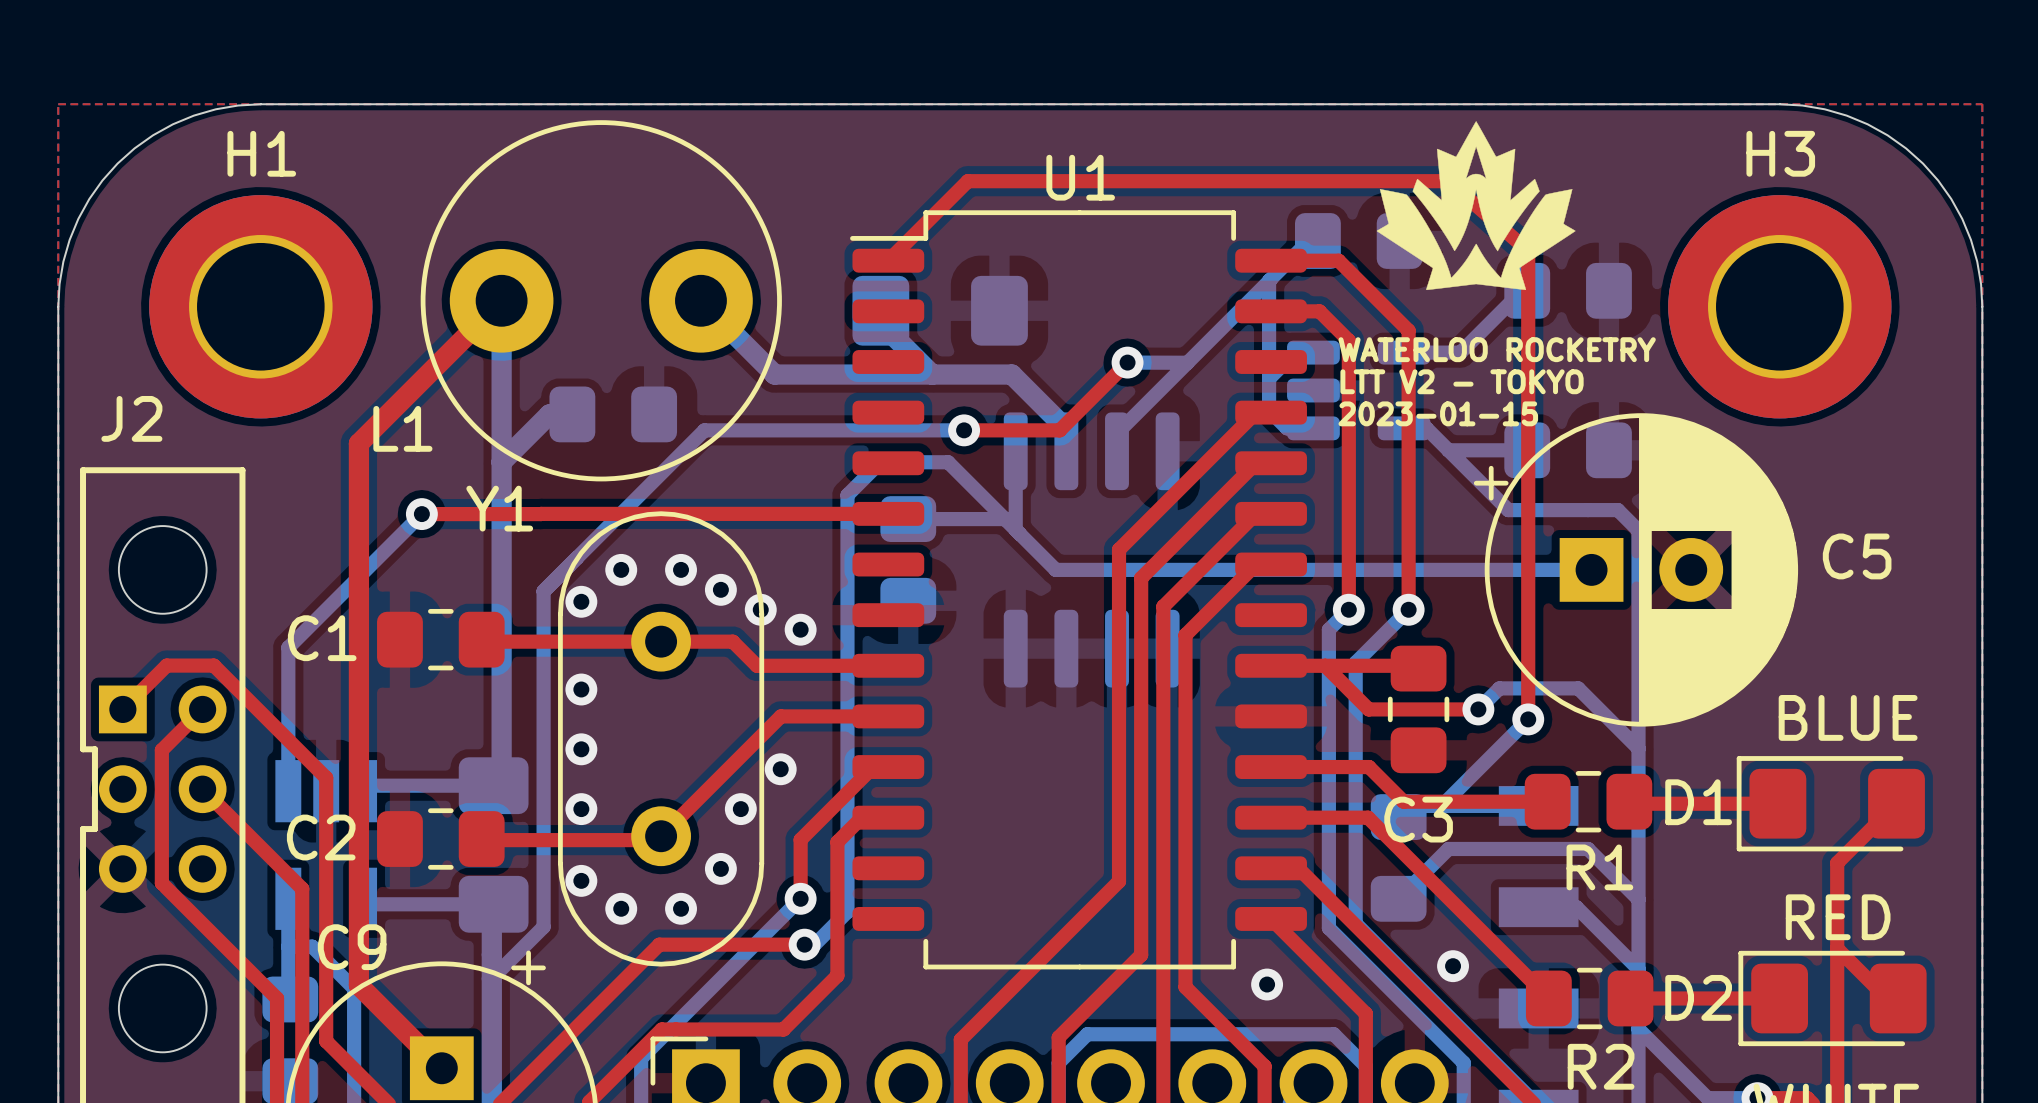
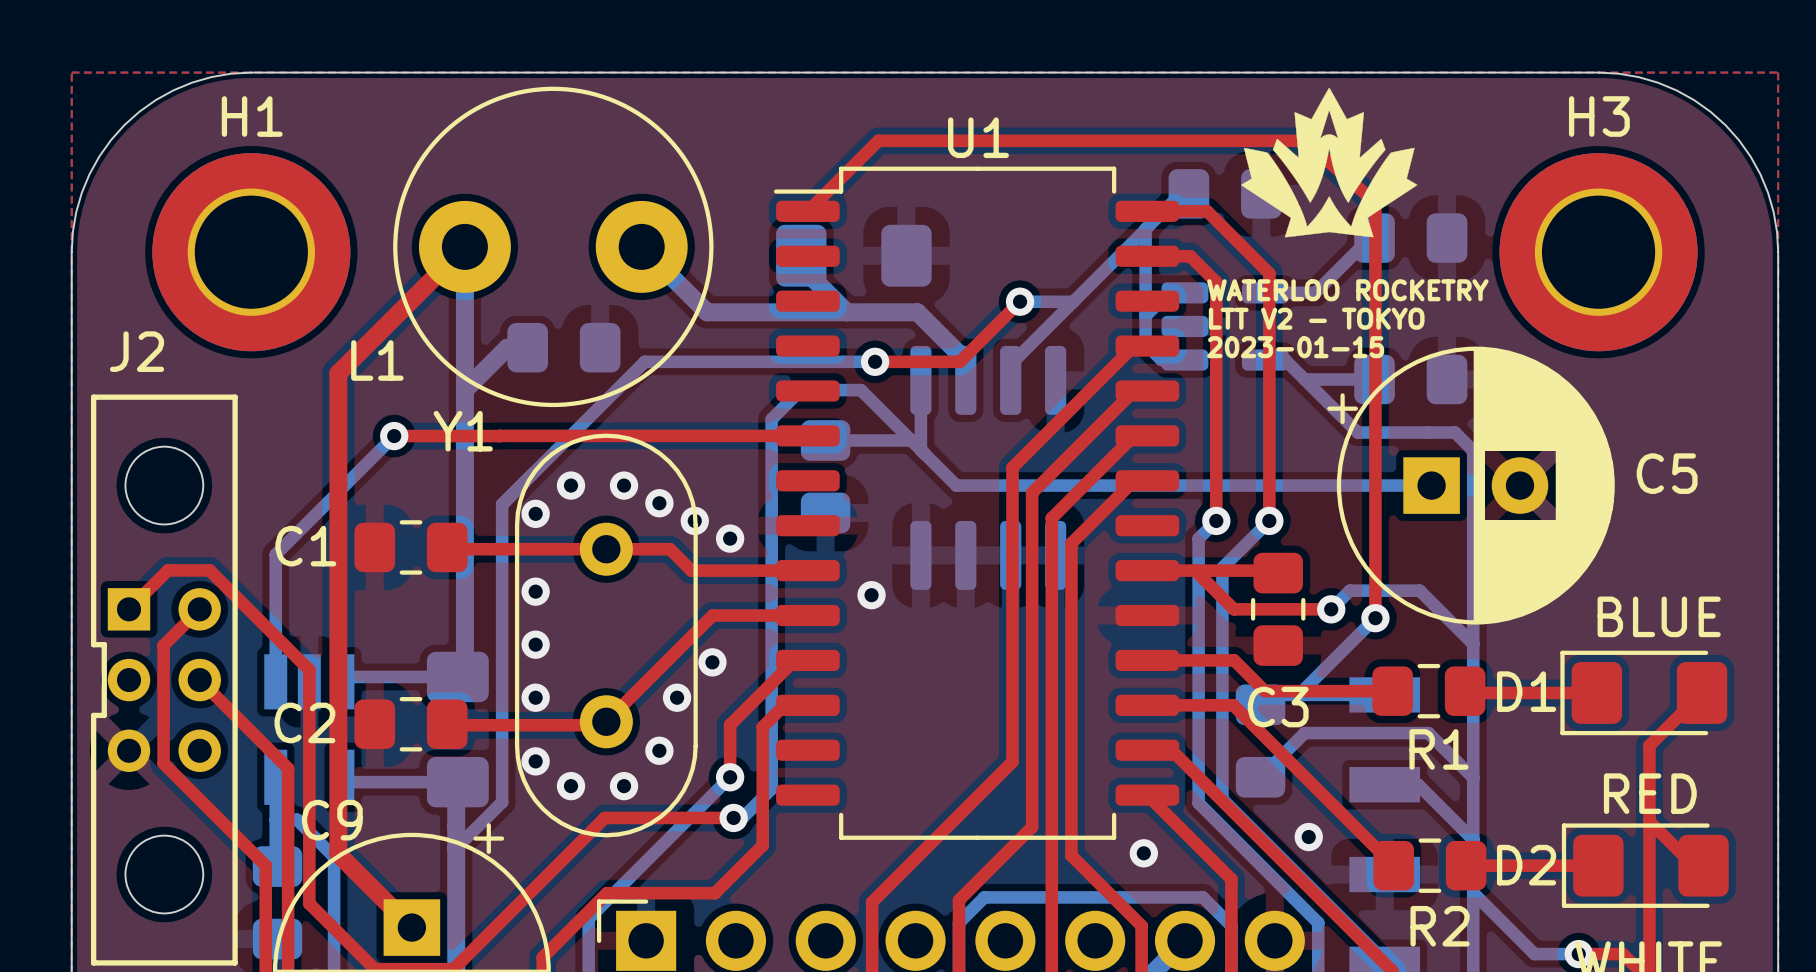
via: none -> (871, 595)

